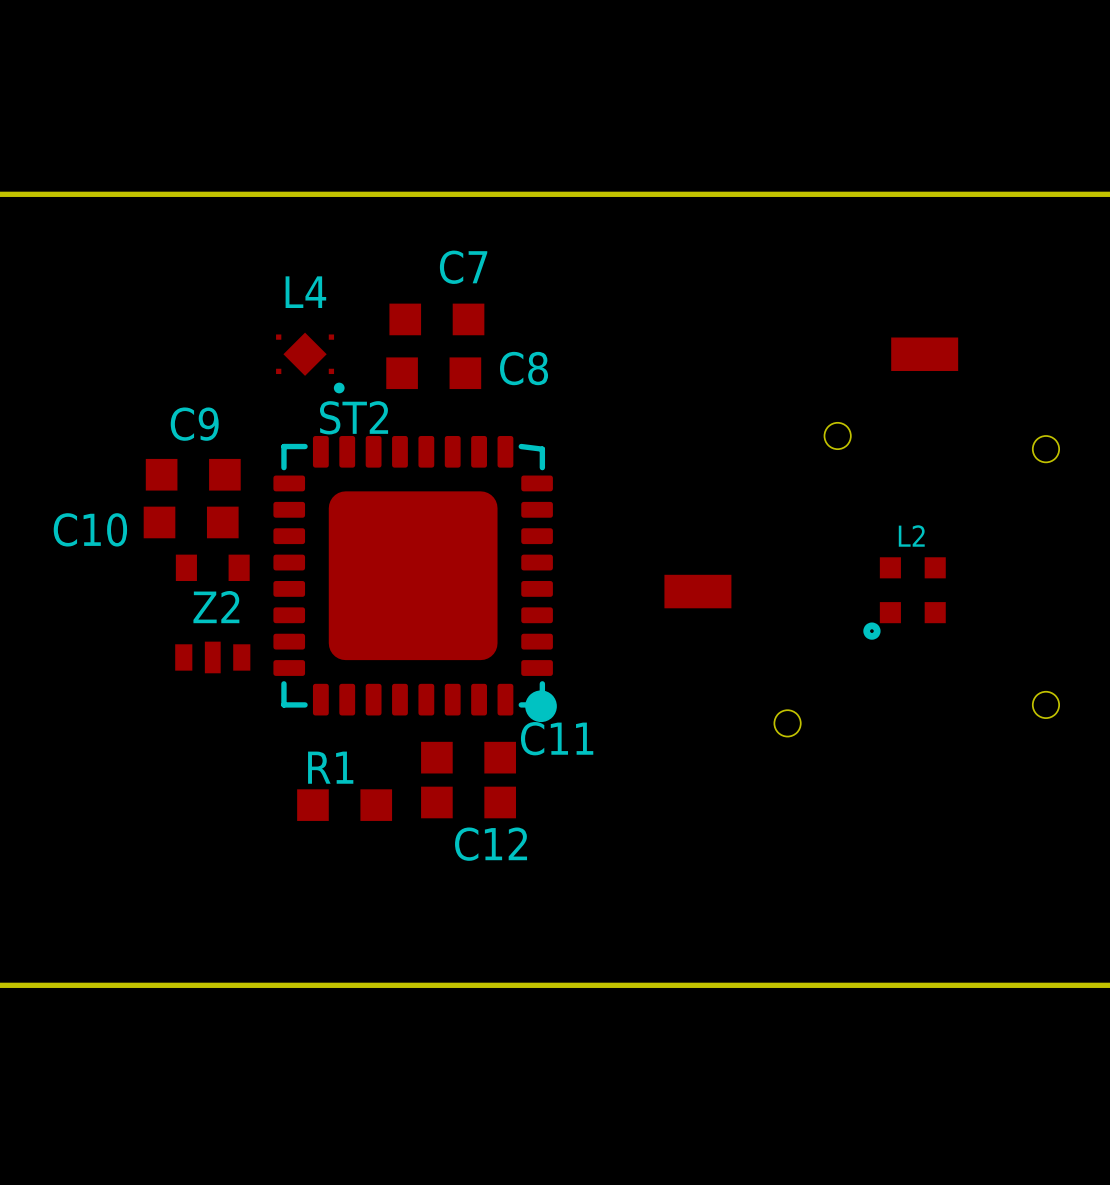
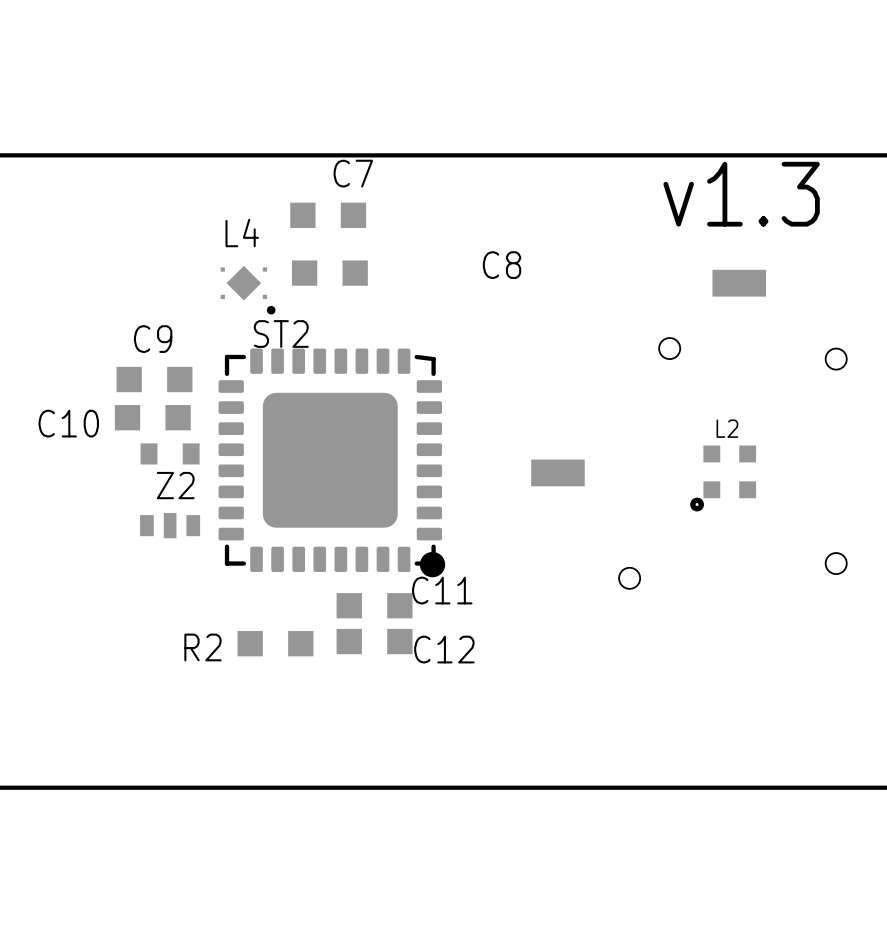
text: none -> v1.3 (741, 194)
C7 position: (436, 319) -> (328, 215)
C8 name position: C8 (524, 368) -> C8 (502, 265)
C8 position: (433, 373) -> (329, 273)
R1 name: R1 (330, 767) -> R2 (203, 647)
C12 name position: C12 (491, 844) -> C12 (444, 649)

